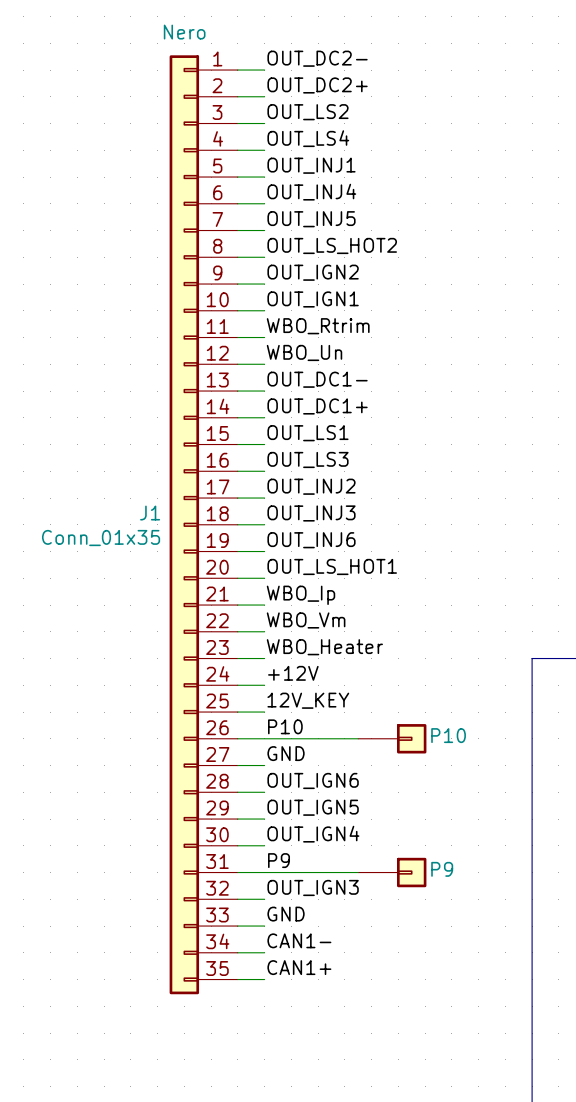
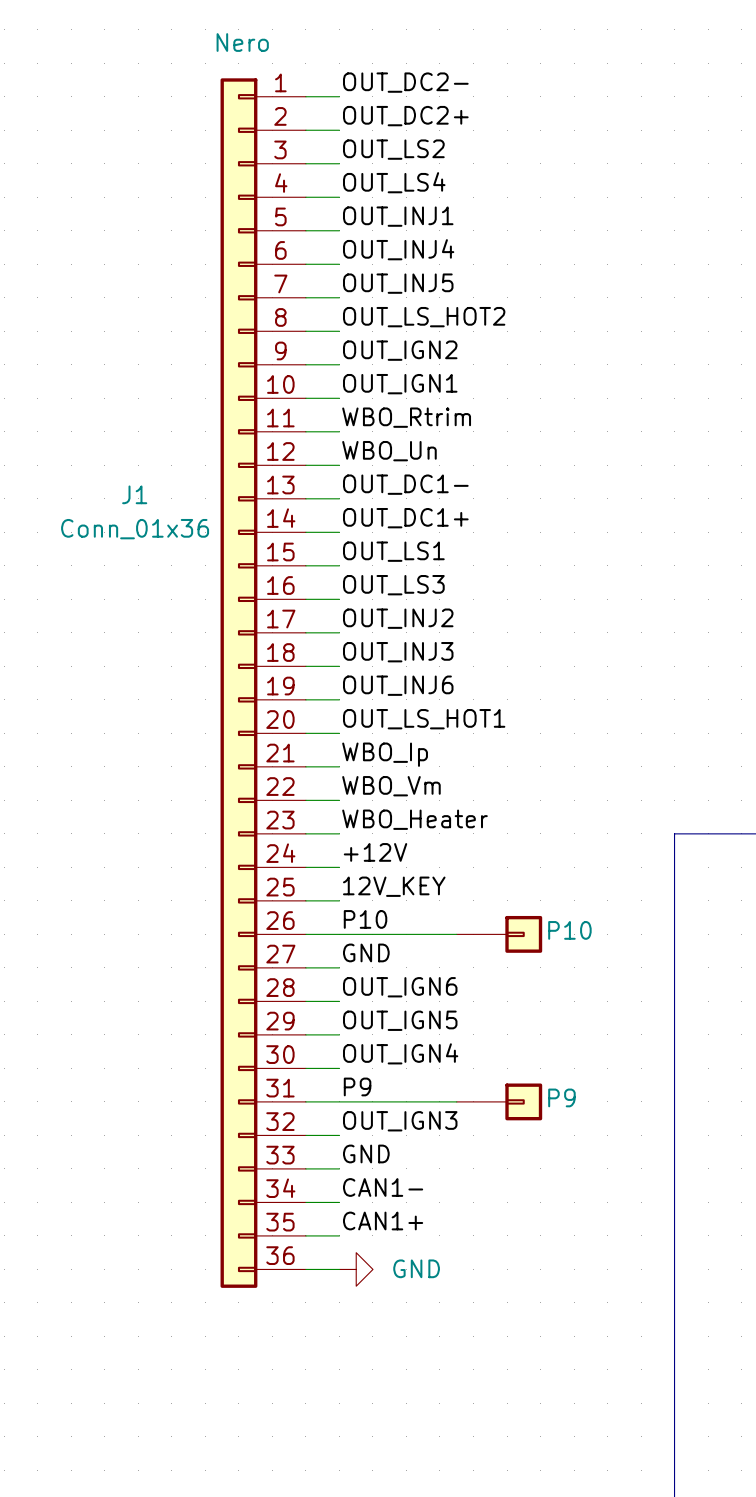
J1 symbol: [169, 55, 238, 995] -> [220, 78, 306, 1288]
J1 name position: J1 (150, 513) -> J1 (134, 494)
J1 value: Conn_01x35 (101, 538) -> Conn_01x36 (135, 529)
wire: none -> (305, 1269) (339, 1269)
power symbol: none -> GND (356, 1269)

